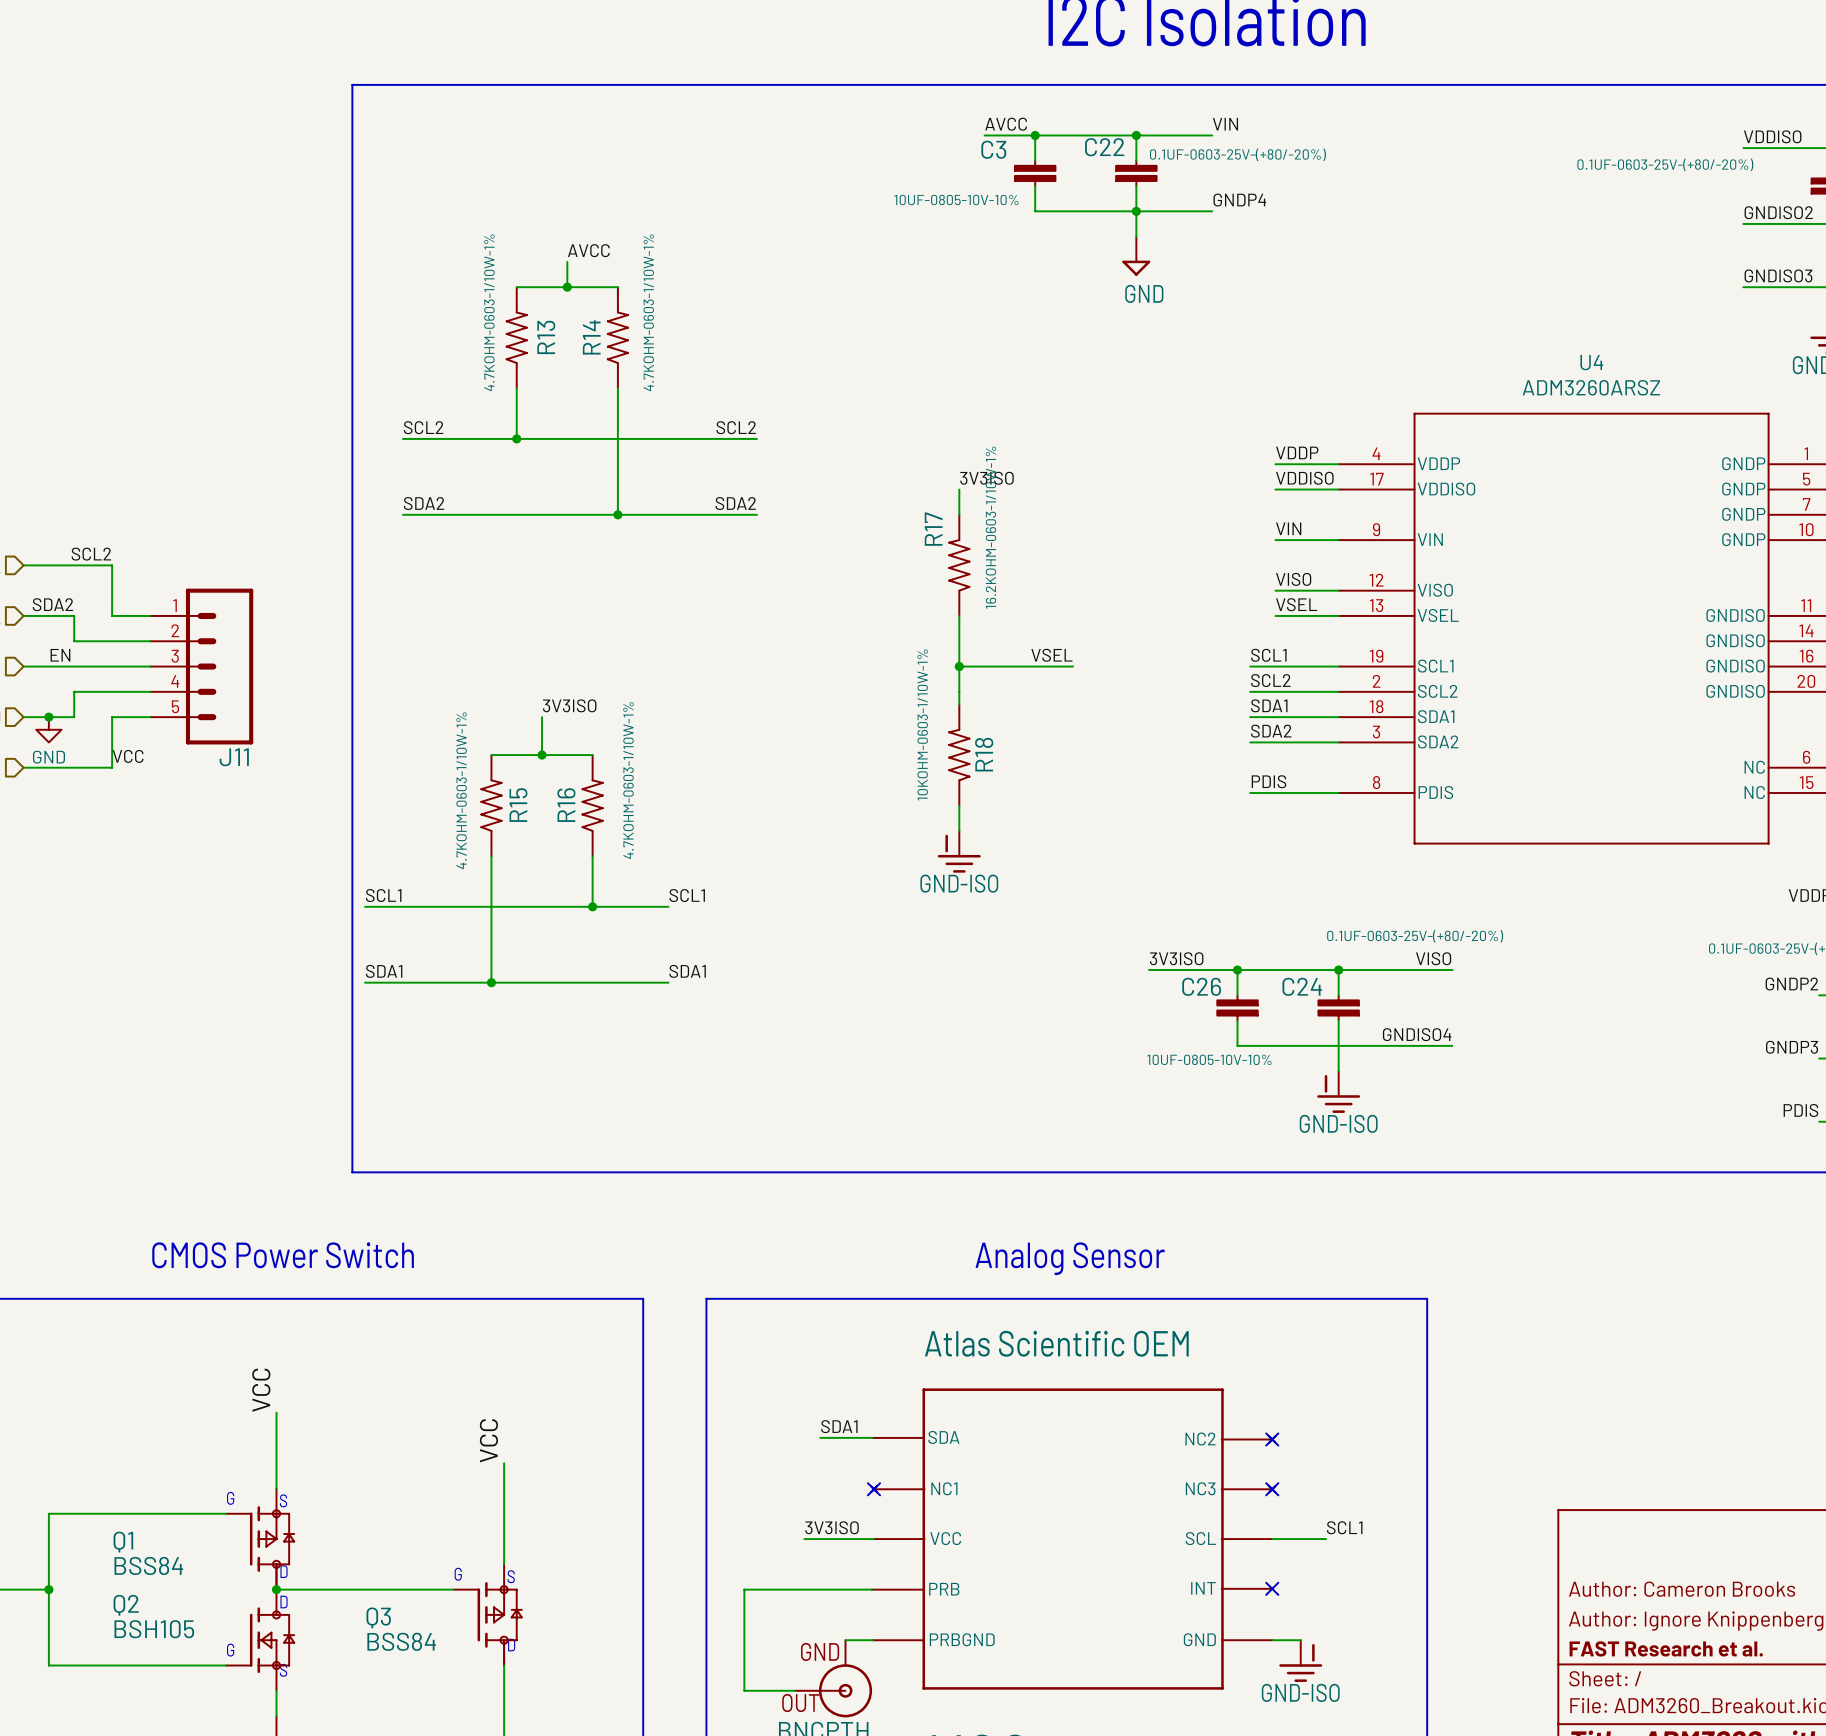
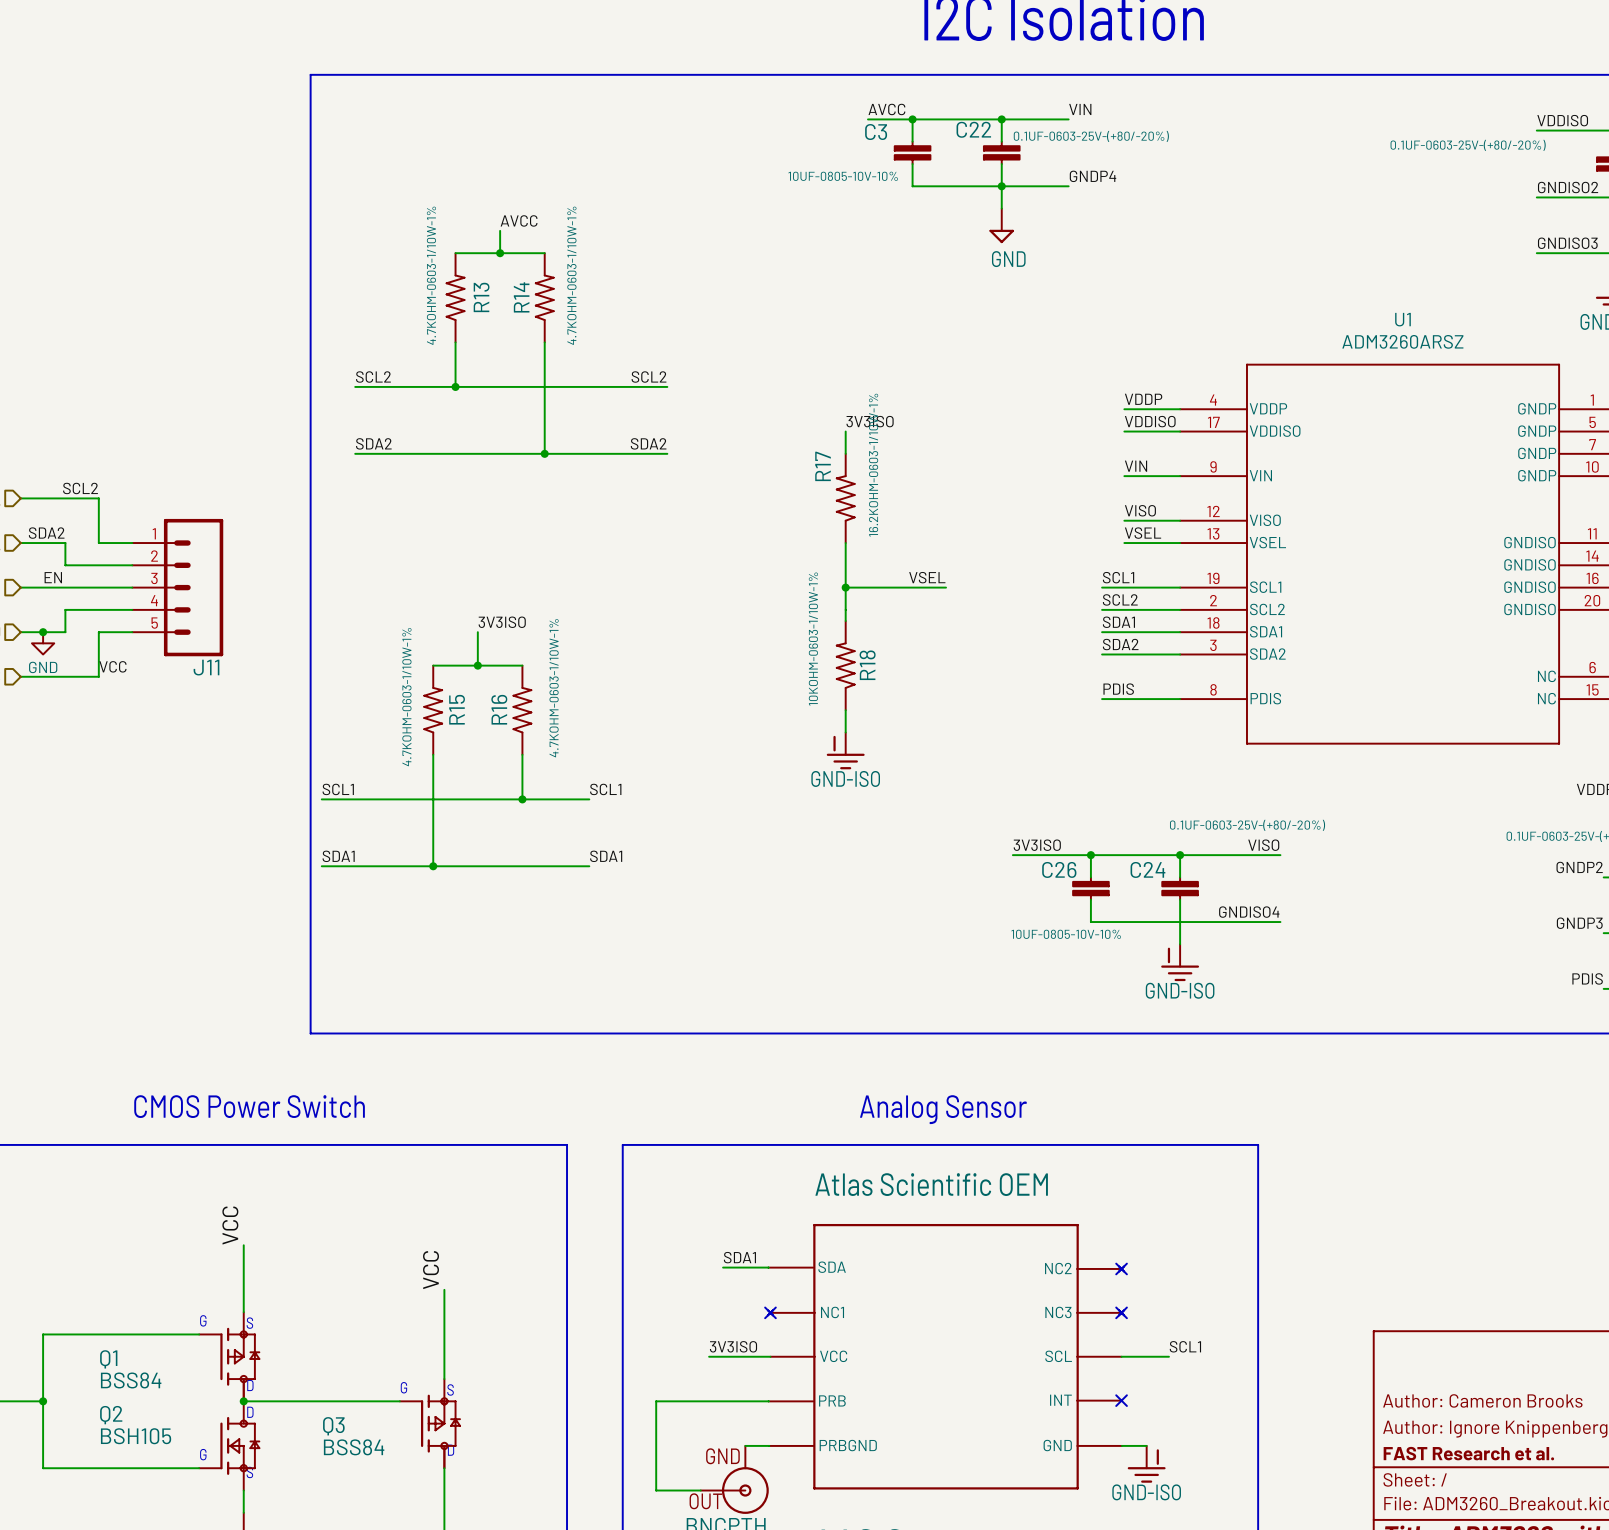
U4 name: U4 (1591, 362) -> U1 (1402, 319)

